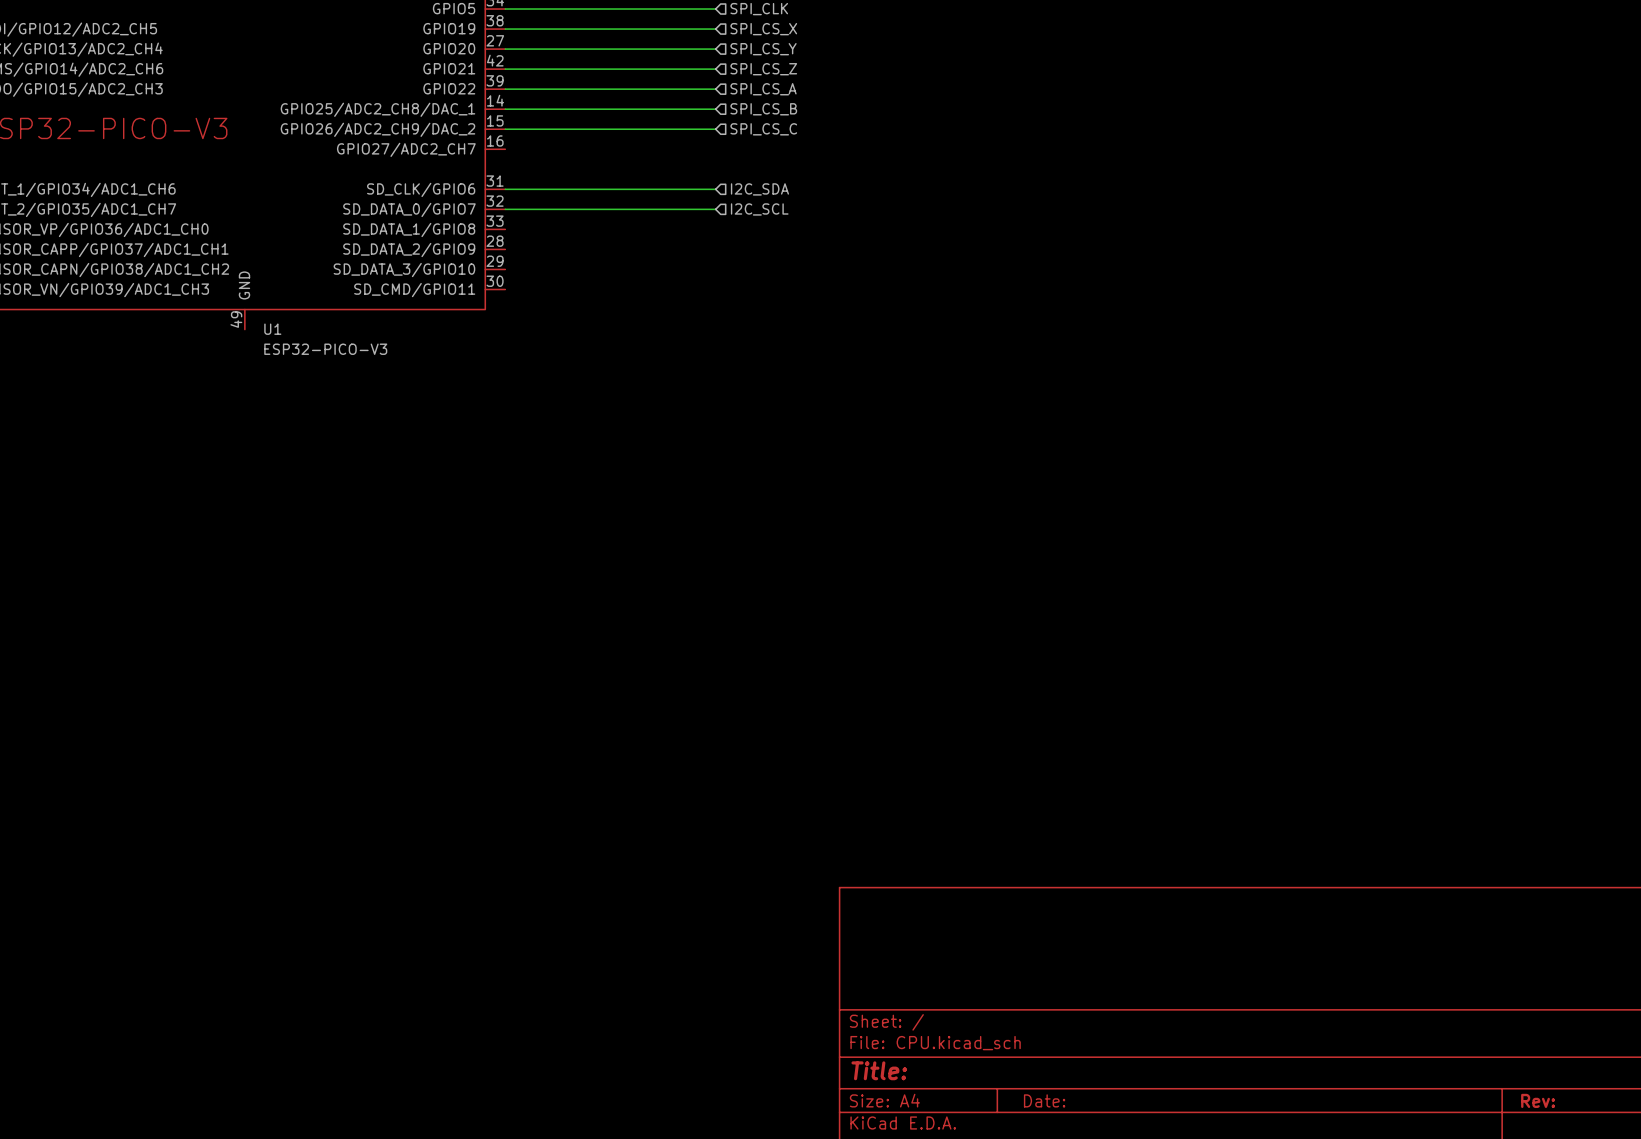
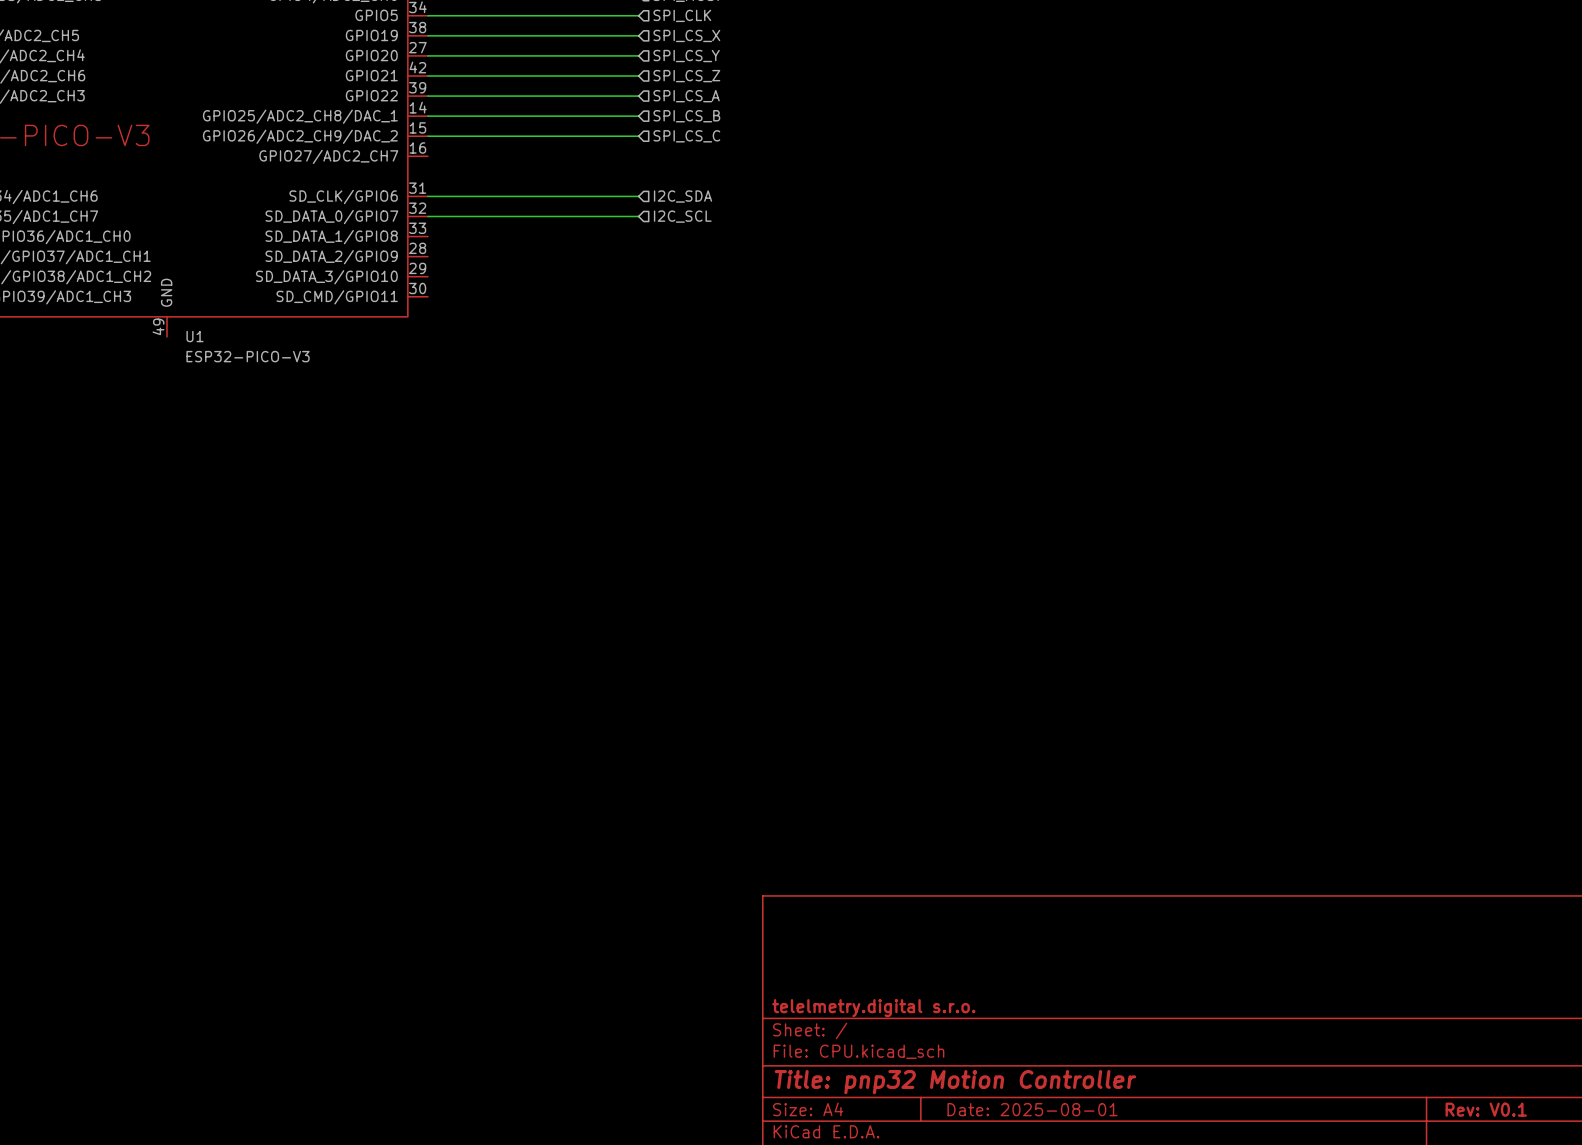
title block: none -> telelmetry.digital s.r.o. (873, 1008)
title block: Title: (879, 1070) -> Title: pnp32 Motion Controller (955, 1082)
title block: Date: (1044, 1100) -> Date: 2025-08-01 (1032, 1109)
title block: Rev: (1538, 1100) -> Rev: V0.1 (1486, 1109)

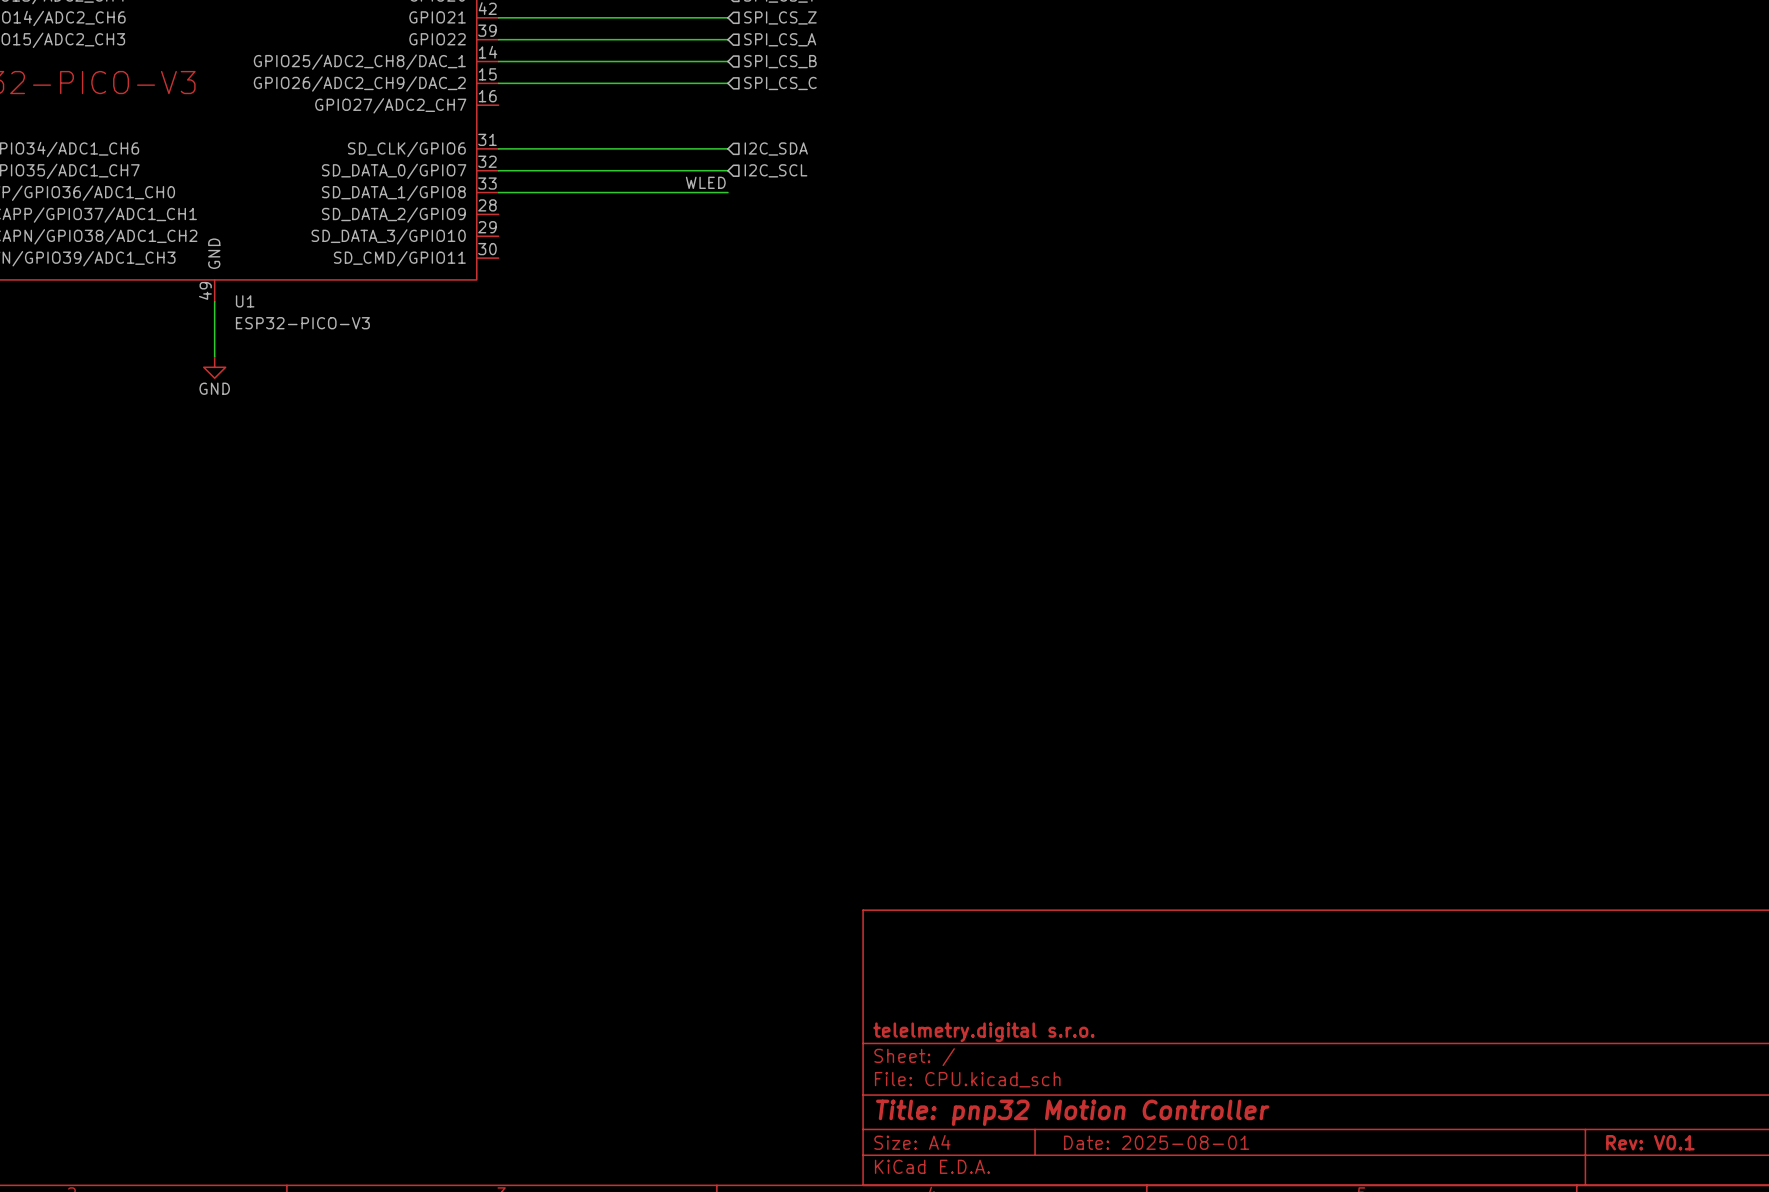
label: none -> WLED (705, 182)
wire: none -> (498, 192) (727, 192)
wire: none -> (214, 301) (214, 356)
power symbol: none -> GND (214, 367)

